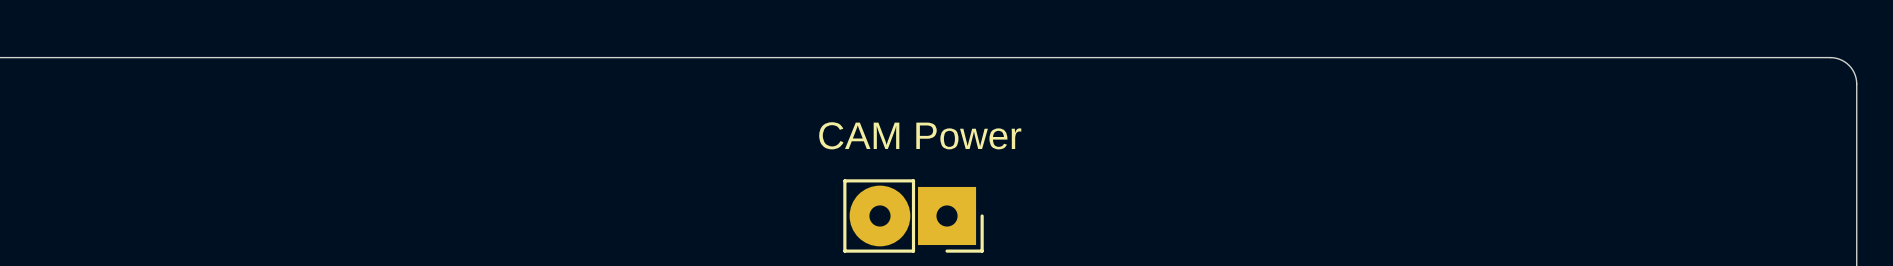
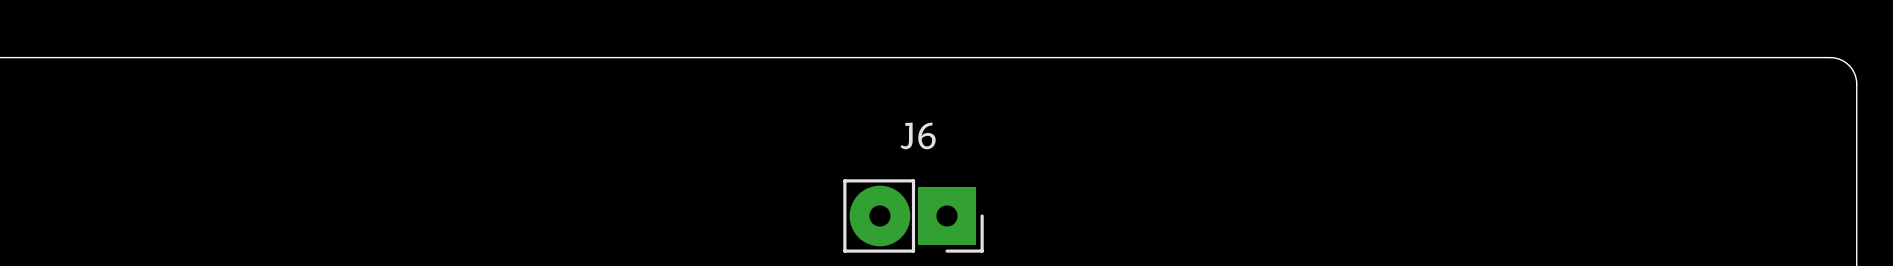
CAM Power name: CAM Power (920, 135) -> J6 (918, 135)

